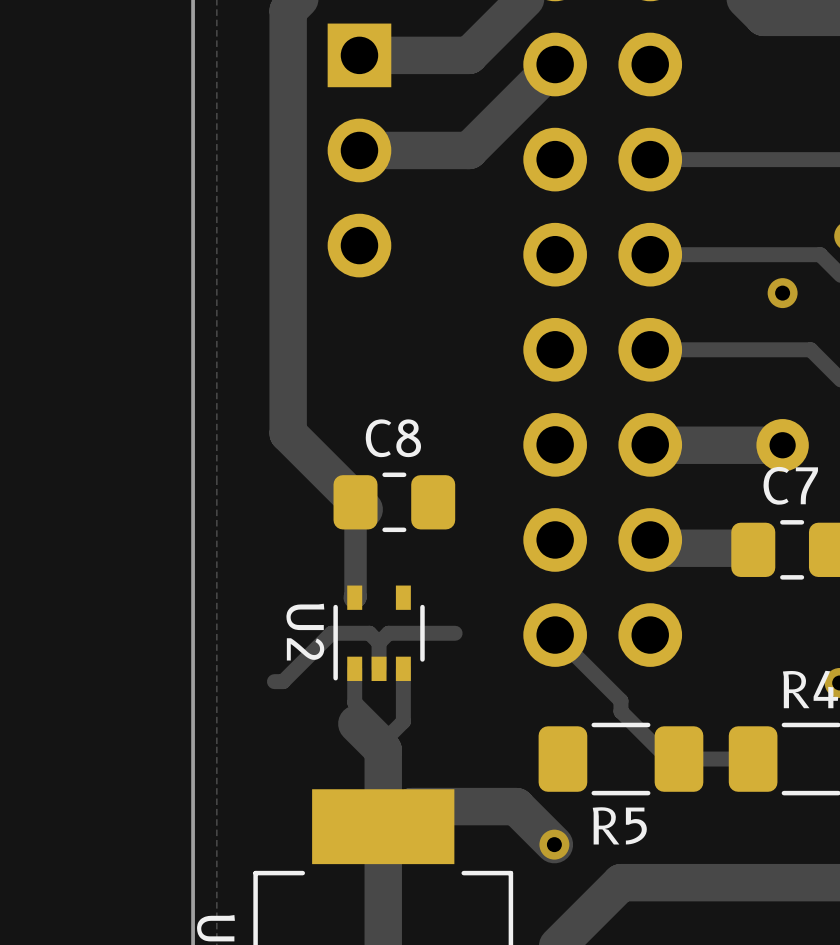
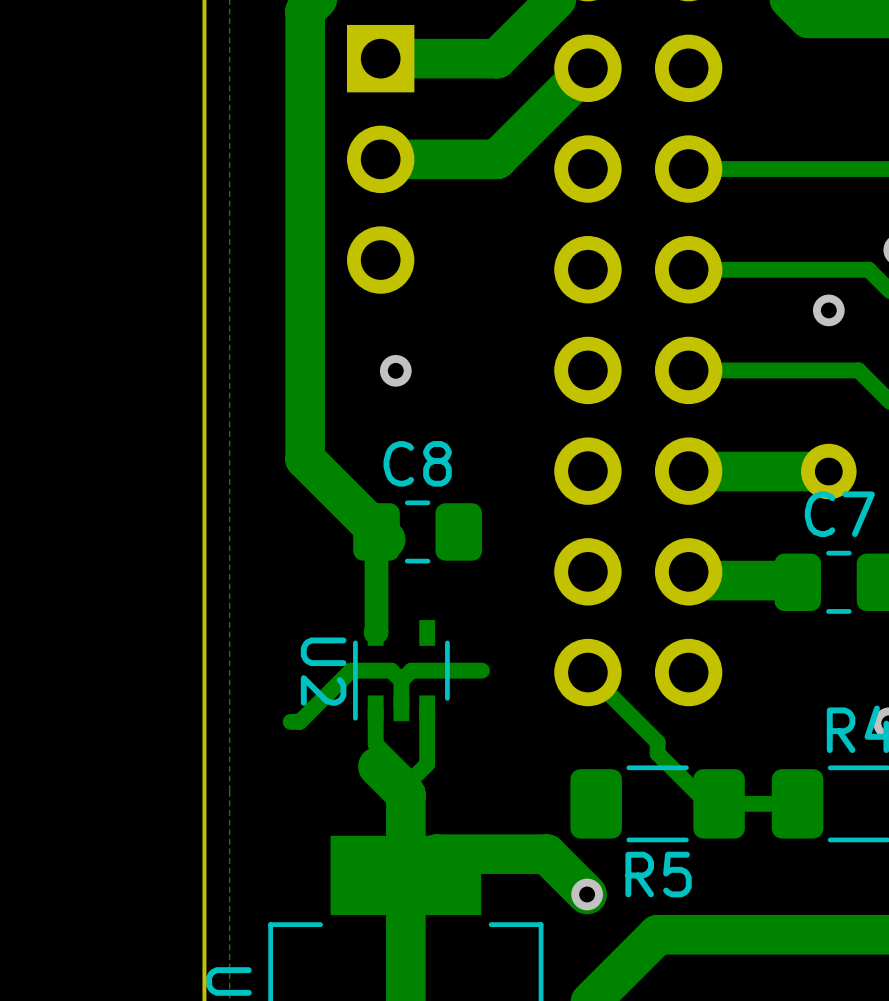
via: none -> (395, 370)

